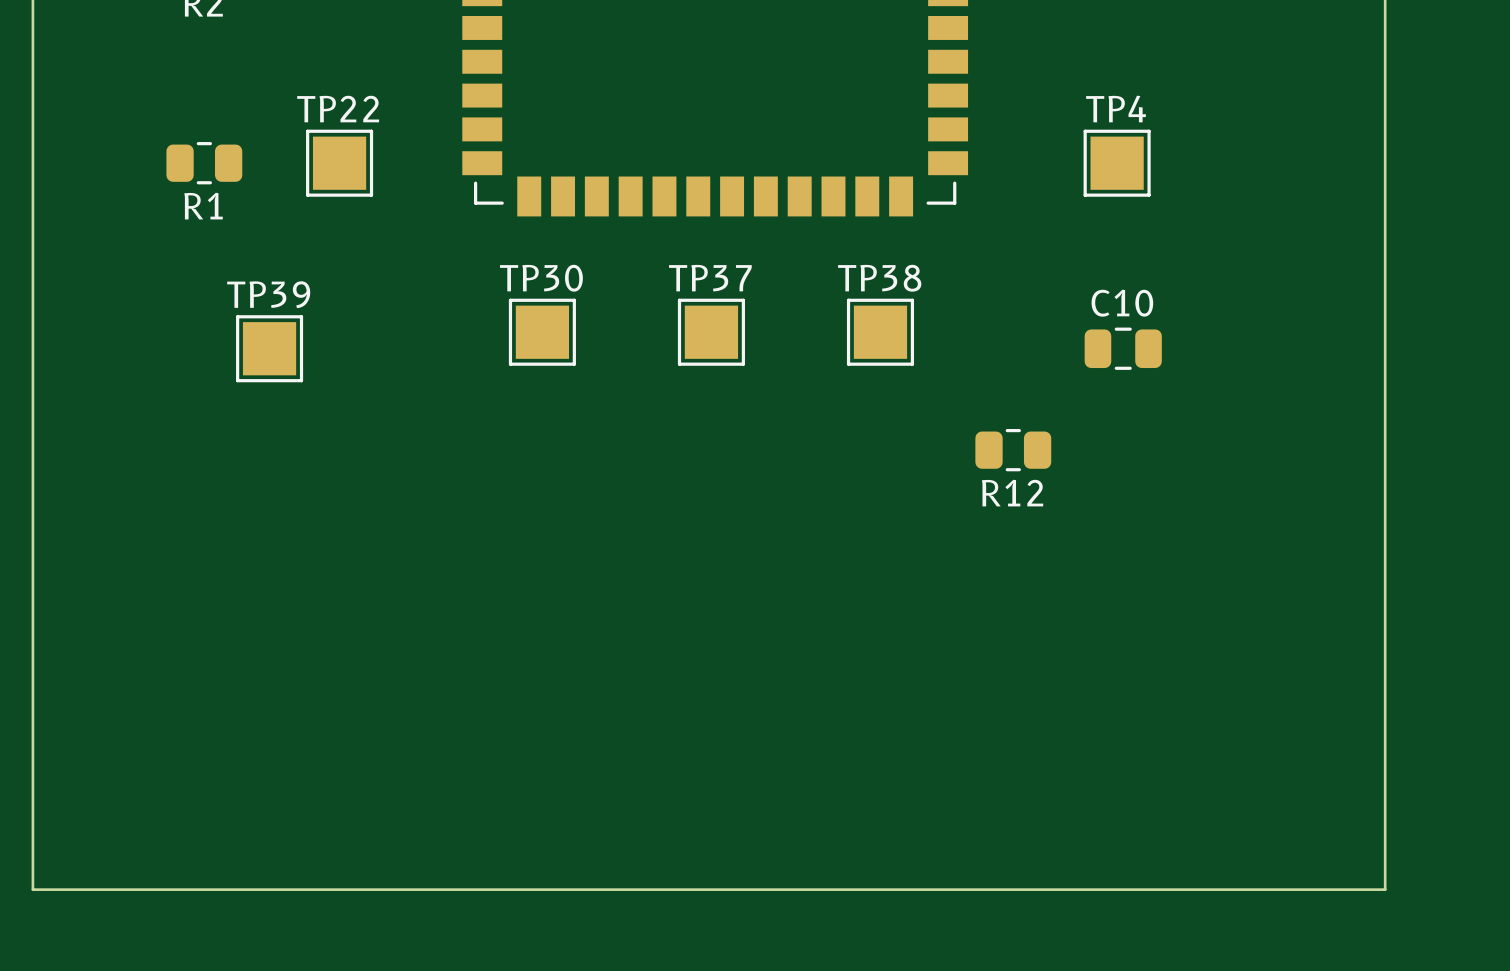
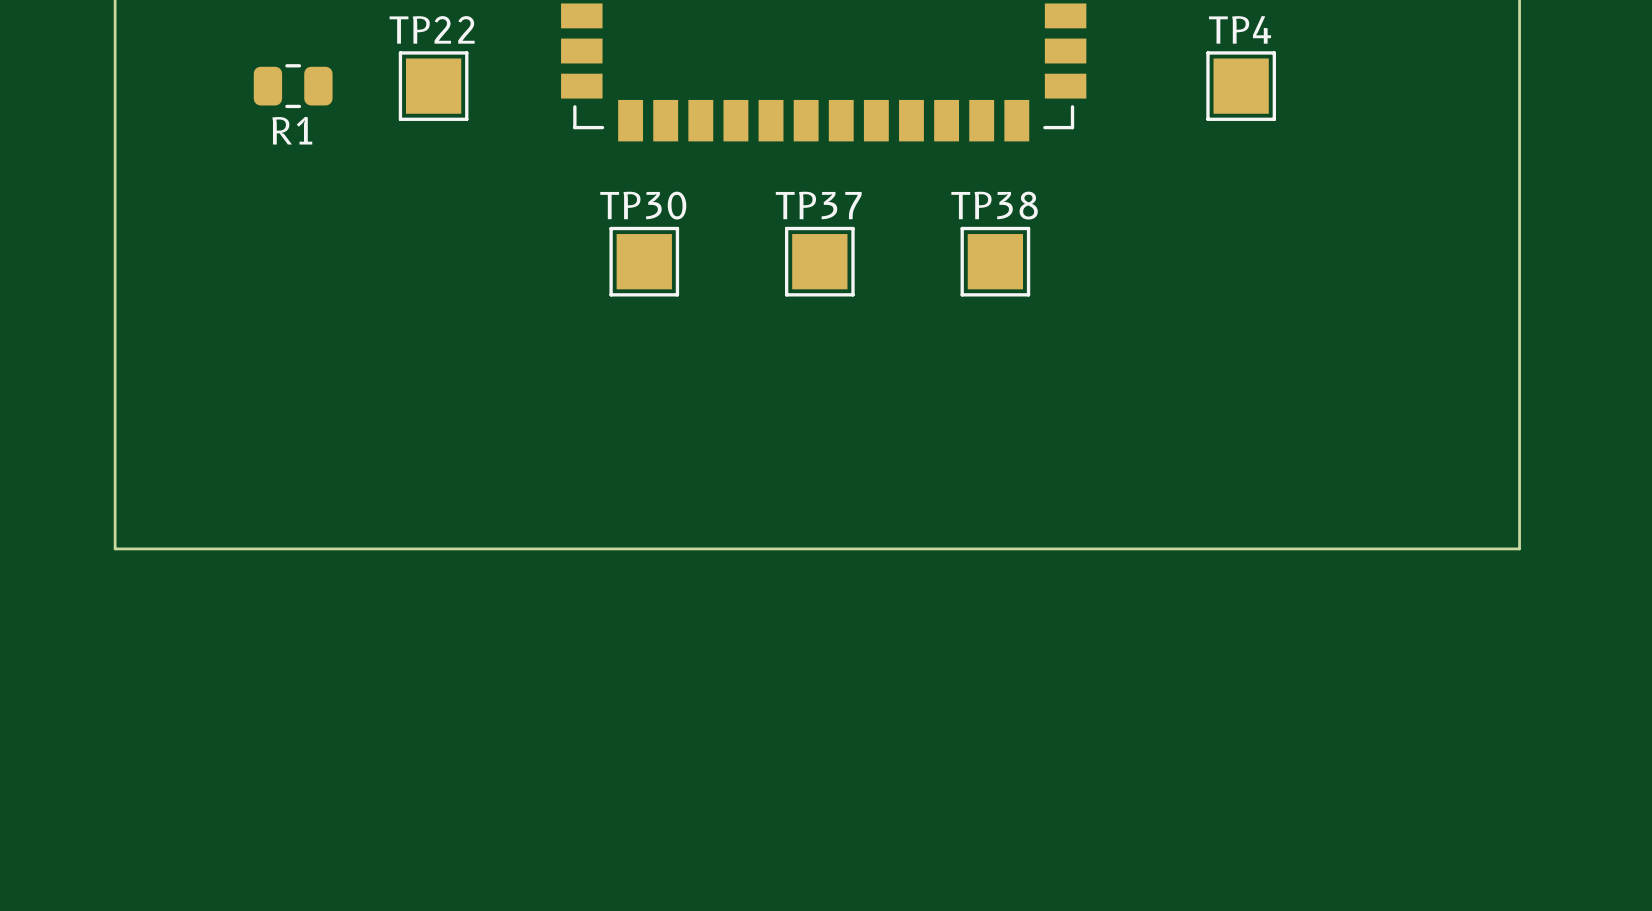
TP39: (269, 348) -> none
C10: (1123, 348) -> none
R12: (1013, 450) -> none
board edge: (32, 608) (32, 889) (1385, 889) (1385, 608) -> (115, 548) (1519, 548)

